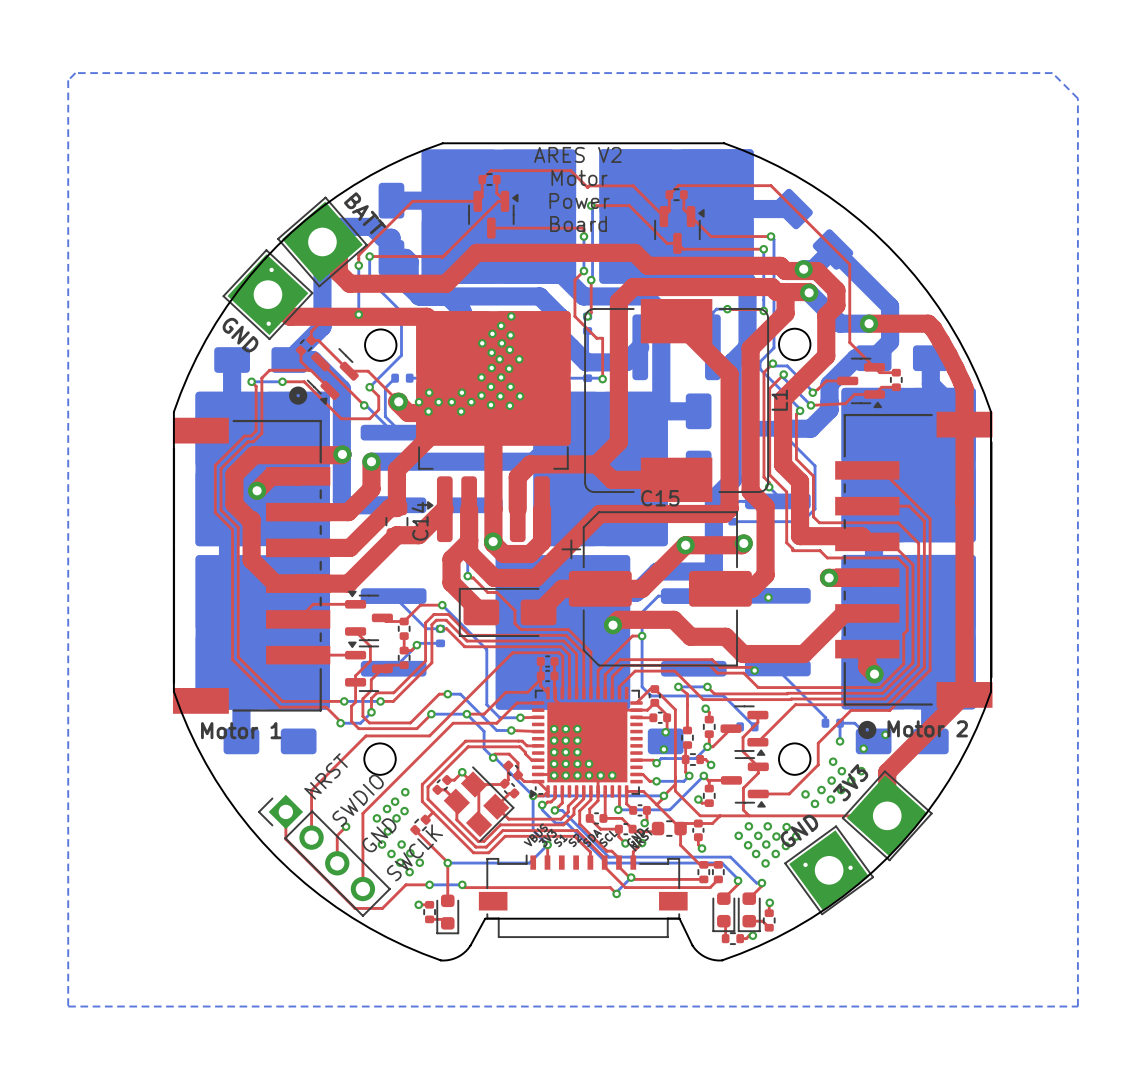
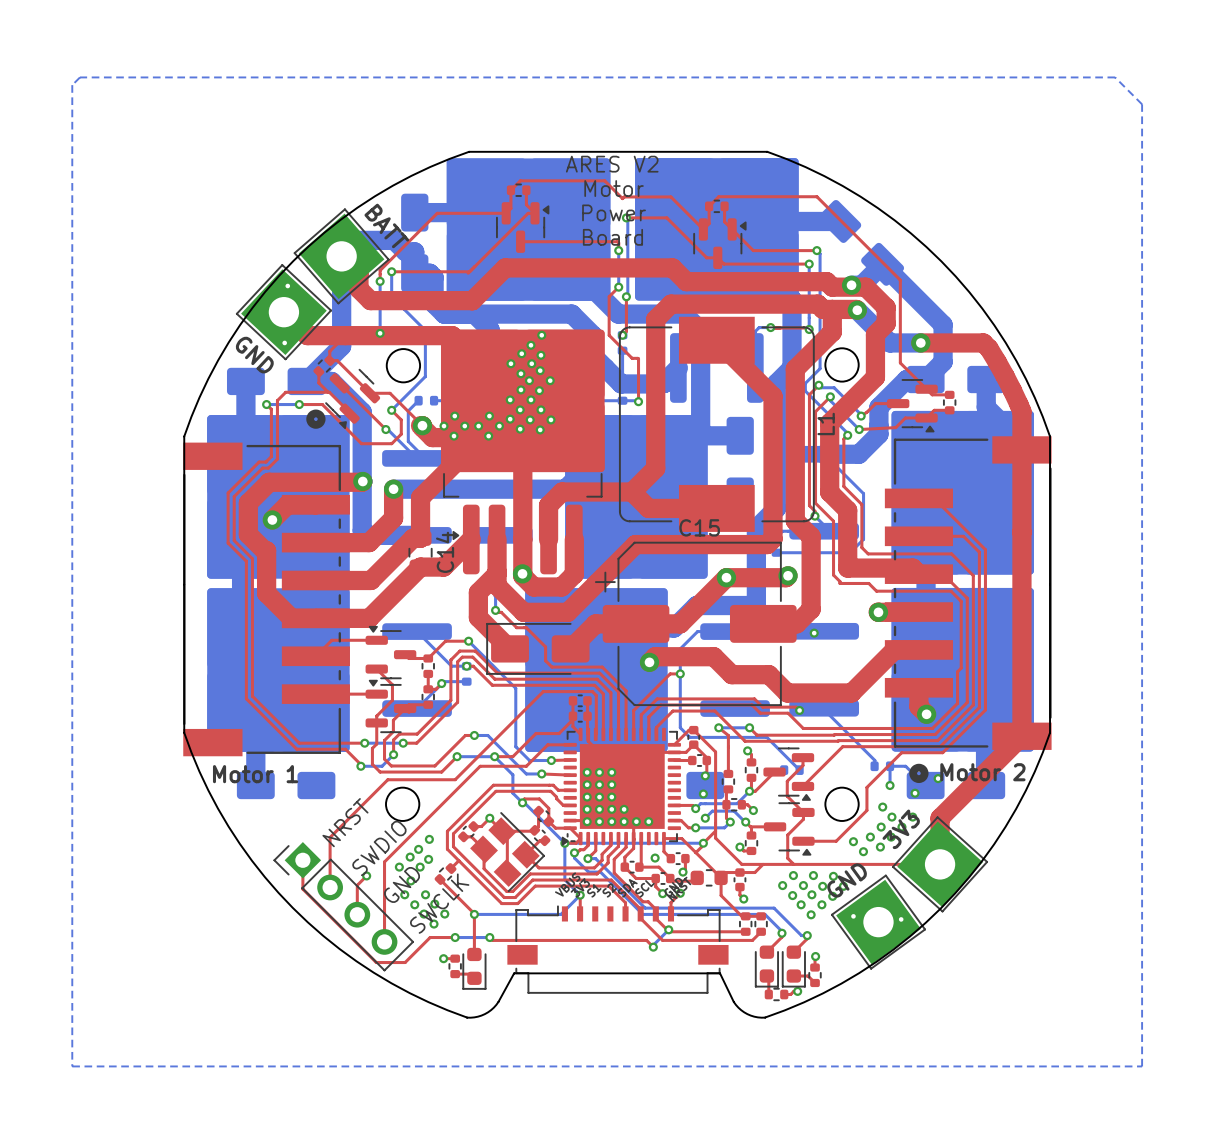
bottom track: none -> (705, 818) (712, 811) (734, 811) (745, 822)
via: none -> (705, 818)
bottom track: (703, 775) (669, 809) (618, 809) -> none
top track: (619, 791) (618, 809) -> none

